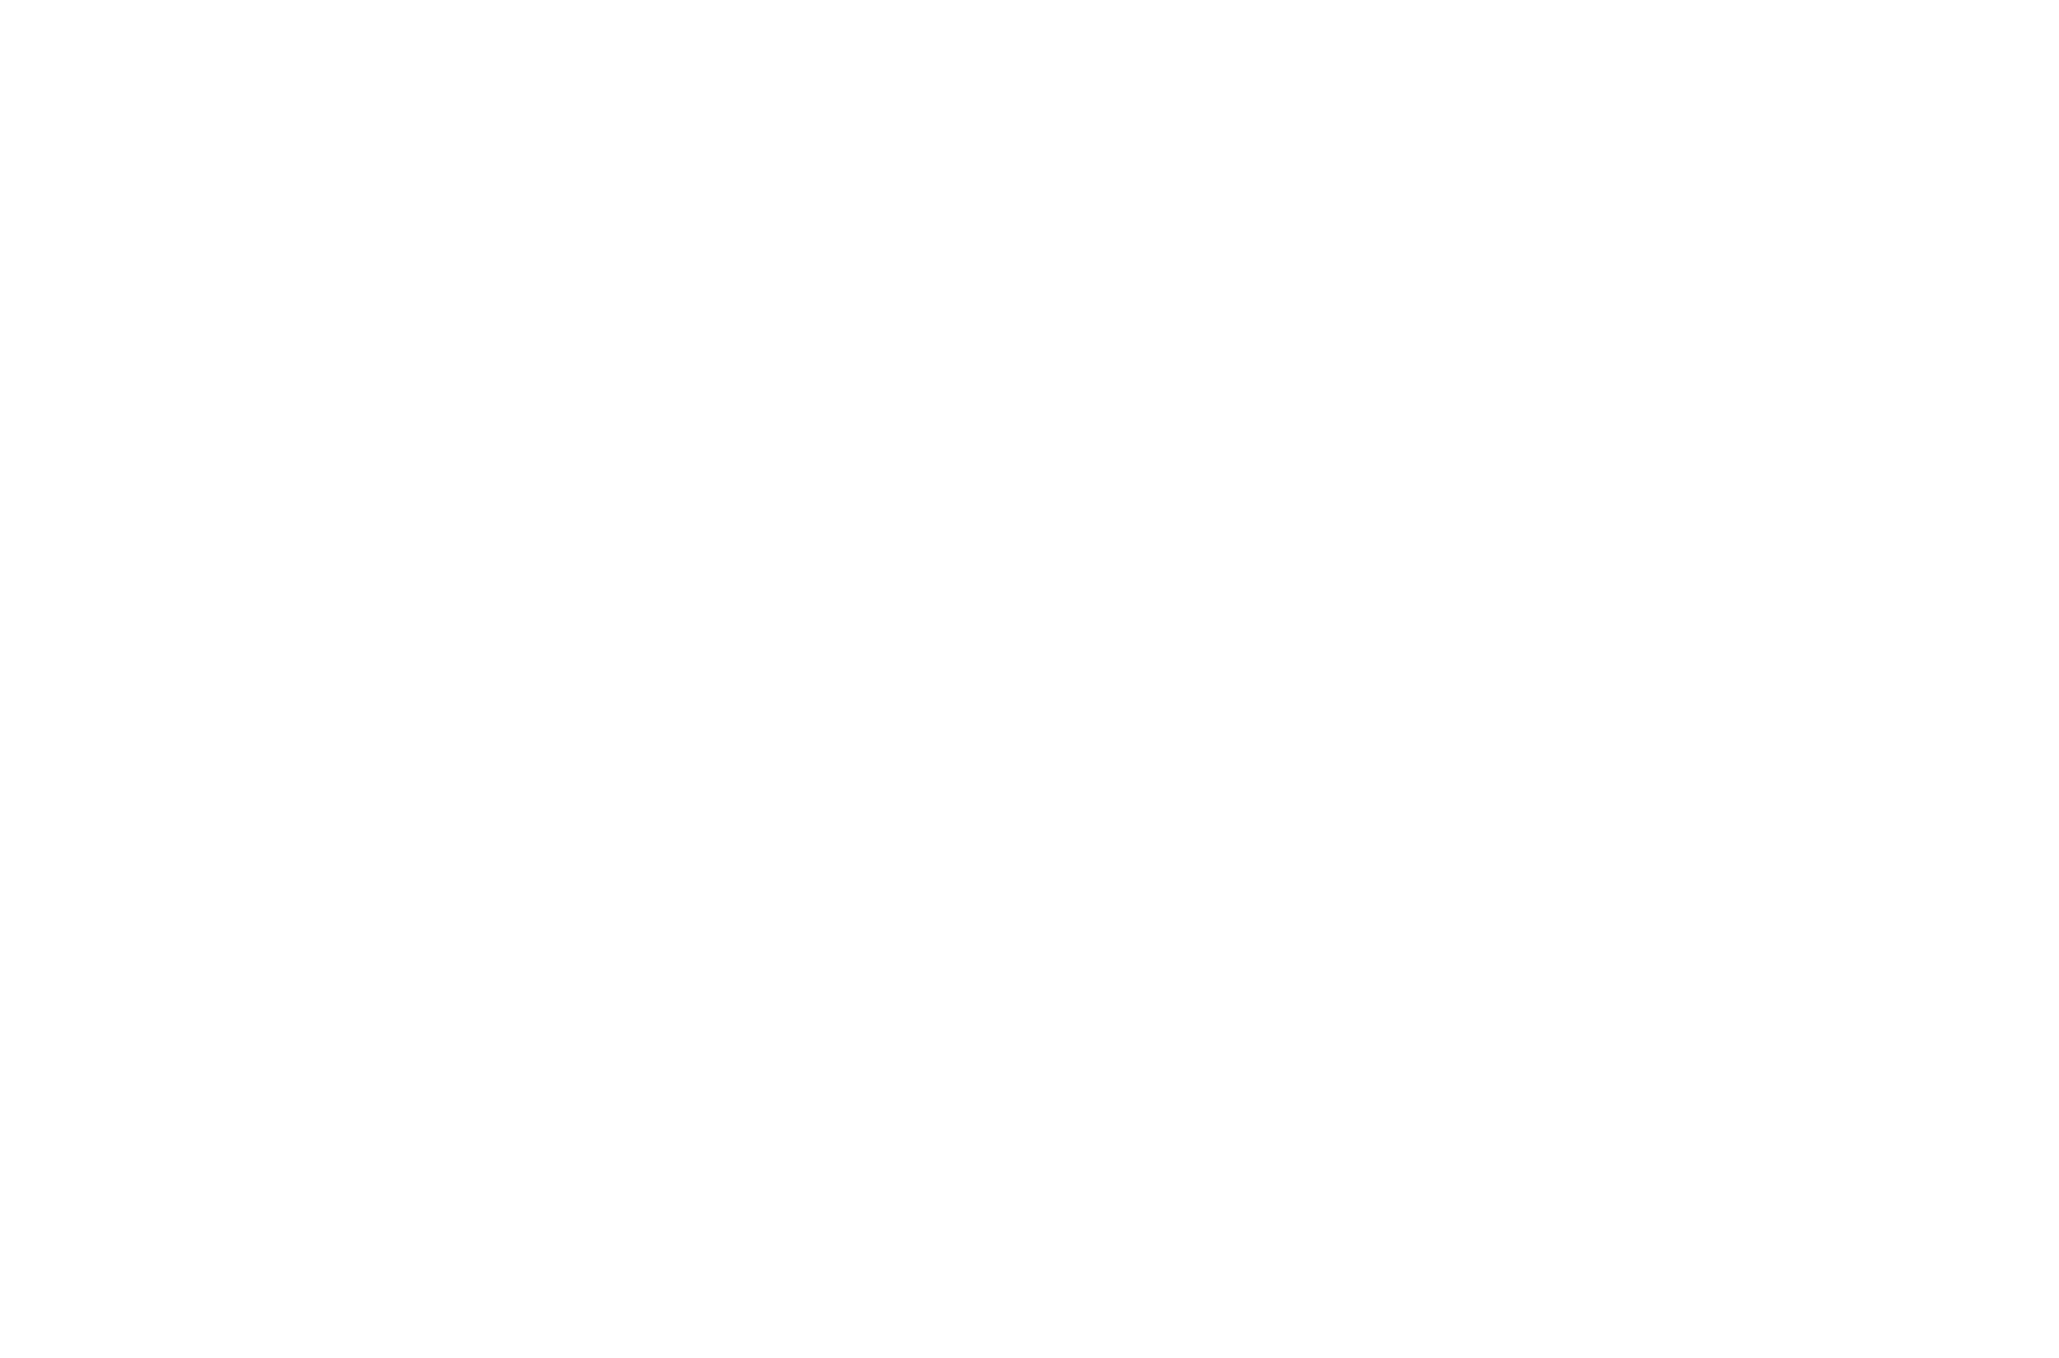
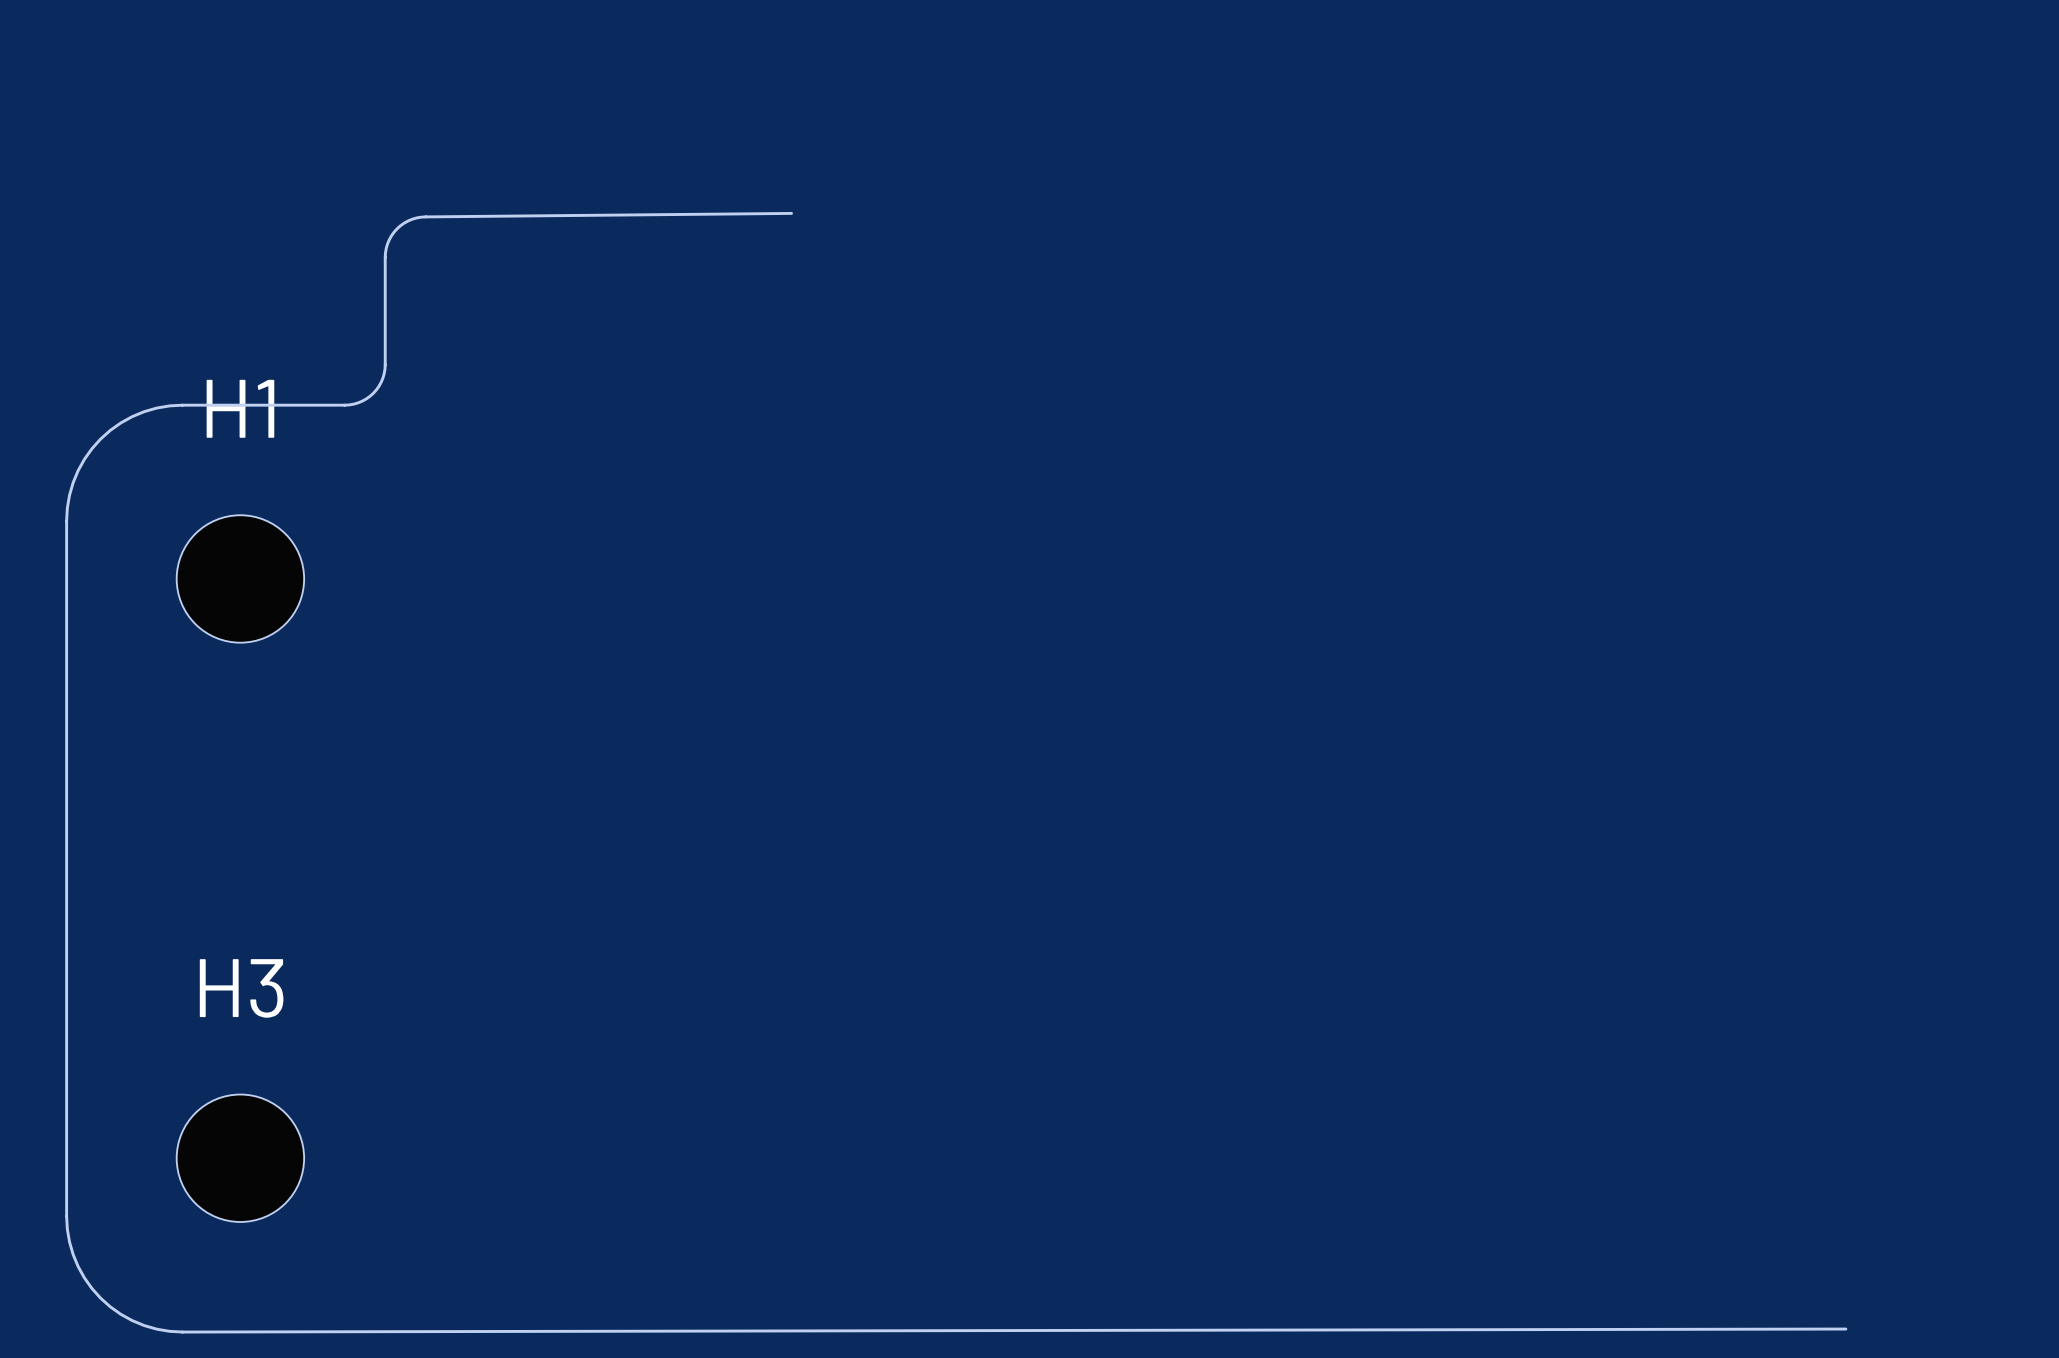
board edge: none -> (791, 213) (425, 216) (412, 219) (400, 225) (394, 232) (386, 248) (384, 369) (381, 382) (369, 396) (358, 402) (344, 405) (182, 405) (156, 408) (120, 422) (100, 439) (84, 459) (69, 495) (66, 521) (66, 1216) (69, 1241) (78, 1266) (100, 1298) (120, 1314) (144, 1325) (182, 1332) (1845, 1329)
H1: none -> (240, 578)
H3: none -> (240, 1158)

